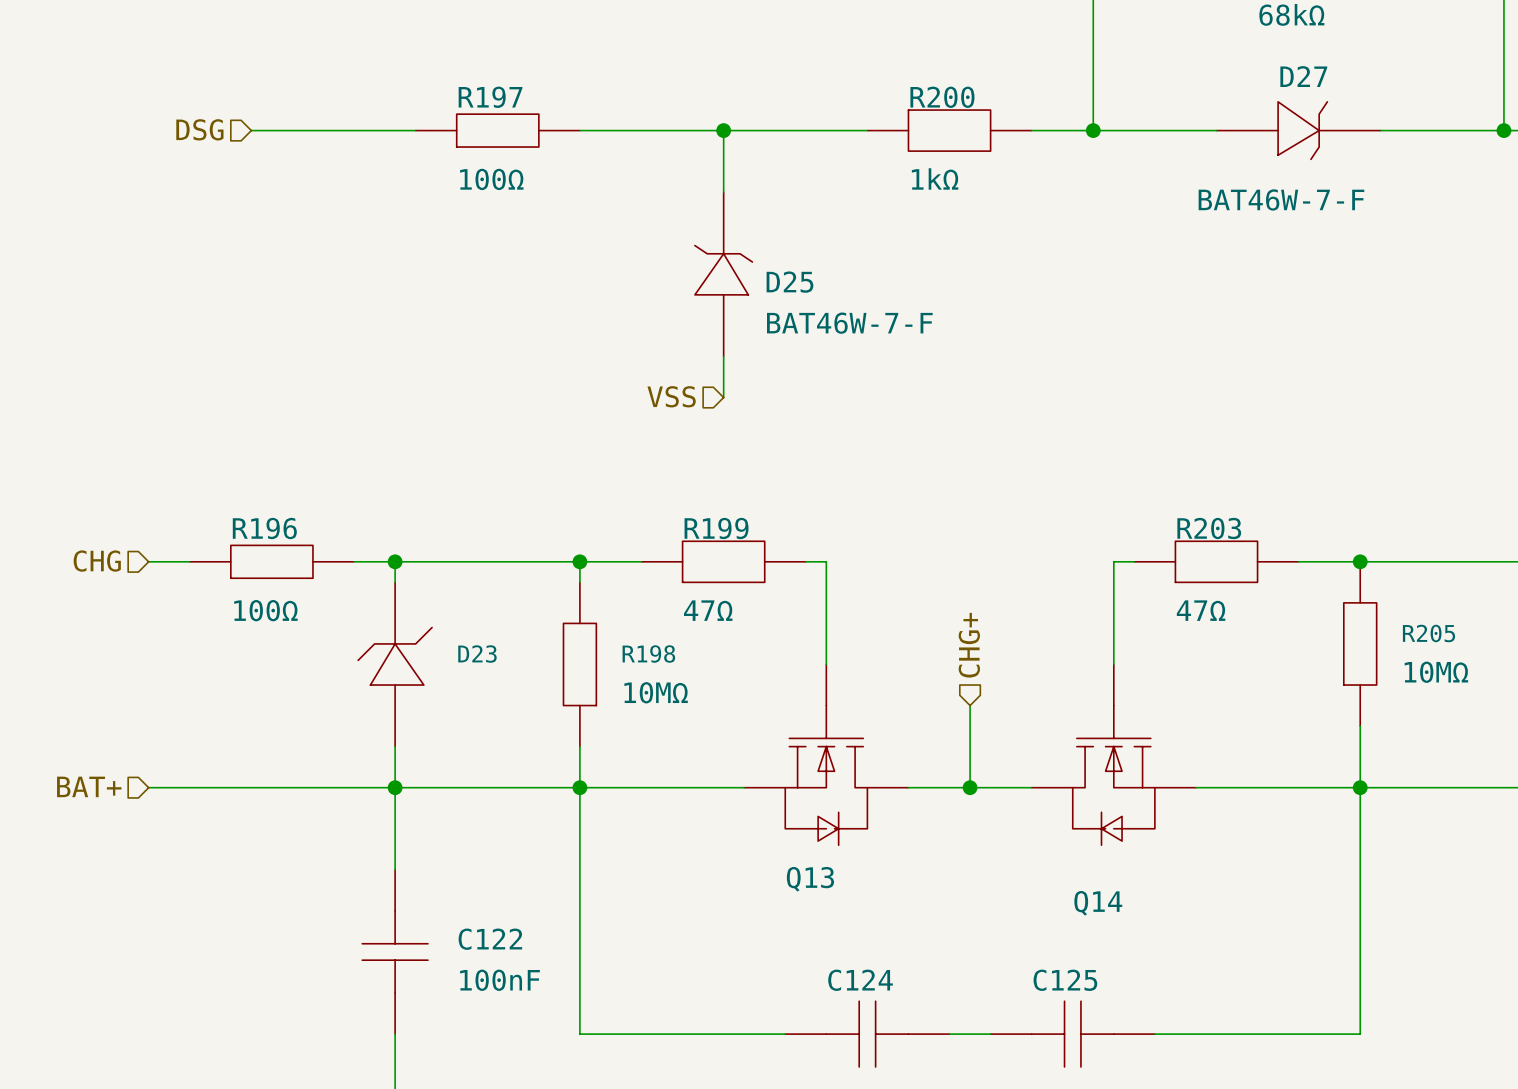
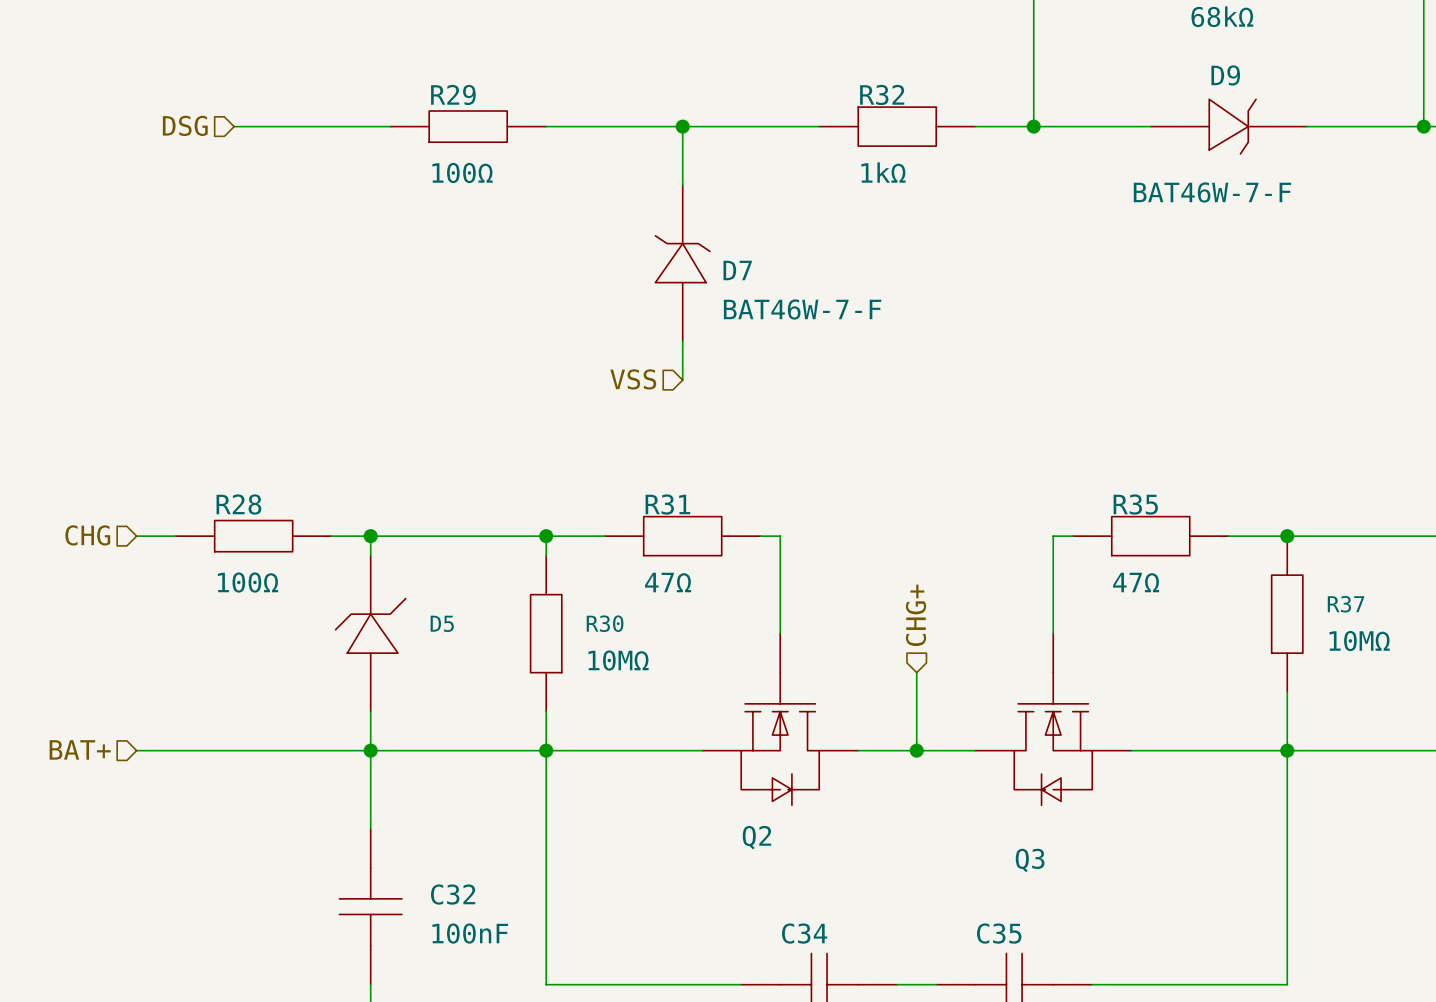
D27 name: D27 (1303, 76) -> D9 (1225, 75)
R197 name: R197 (490, 97) -> R29 (453, 94)
R200 name: R200 (942, 97) -> R32 (882, 94)
D25 name: D25 (789, 282) -> D7 (737, 270)
R196 name: R196 (264, 528) -> R28 (238, 504)
R199 name: R199 (716, 528) -> R31 (667, 504)
R203 name: R203 (1209, 528) -> R35 (1135, 504)
R205 name: R205 (1428, 633) -> R37 (1346, 604)
D23 name: D23 (477, 654) -> D5 (442, 623)
R198 name: R198 (648, 654) -> R30 (605, 623)
Q13 name: Q13 (810, 879) -> Q2 (756, 837)
Q14 name: Q14 (1098, 903) -> Q3 (1030, 860)
C122 name: C122 (490, 939) -> C32 (453, 894)
C124 name: C124 (860, 980) -> C34 (804, 933)
C125 name: C125 (1065, 980) -> C35 (999, 933)

